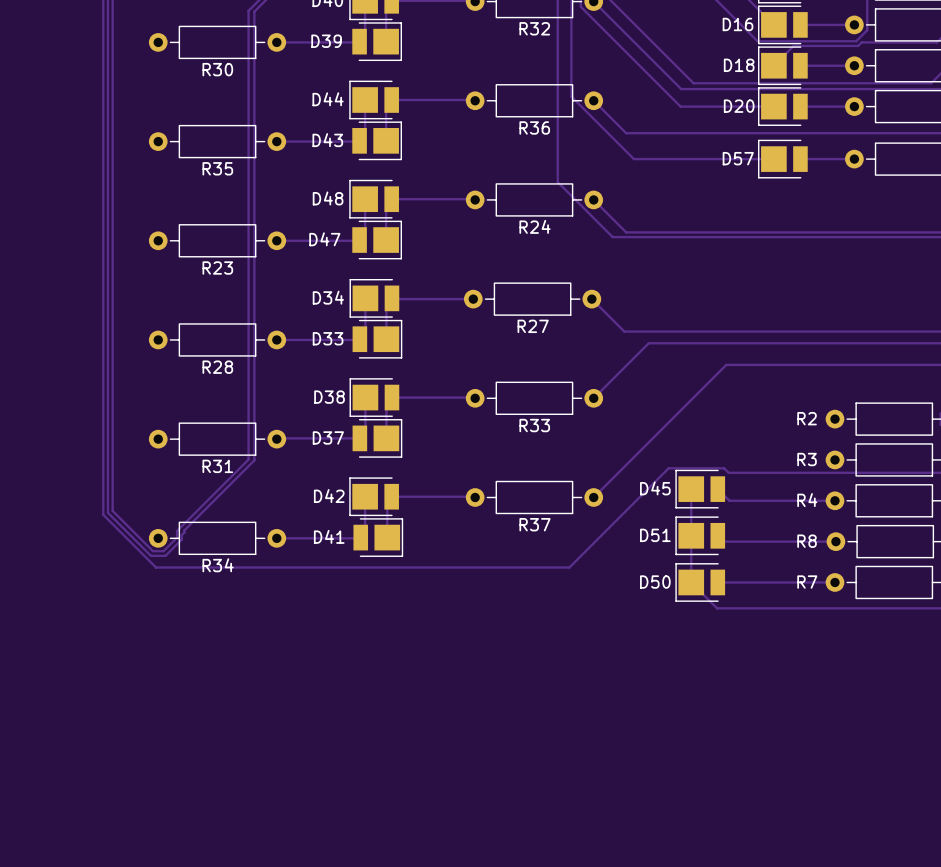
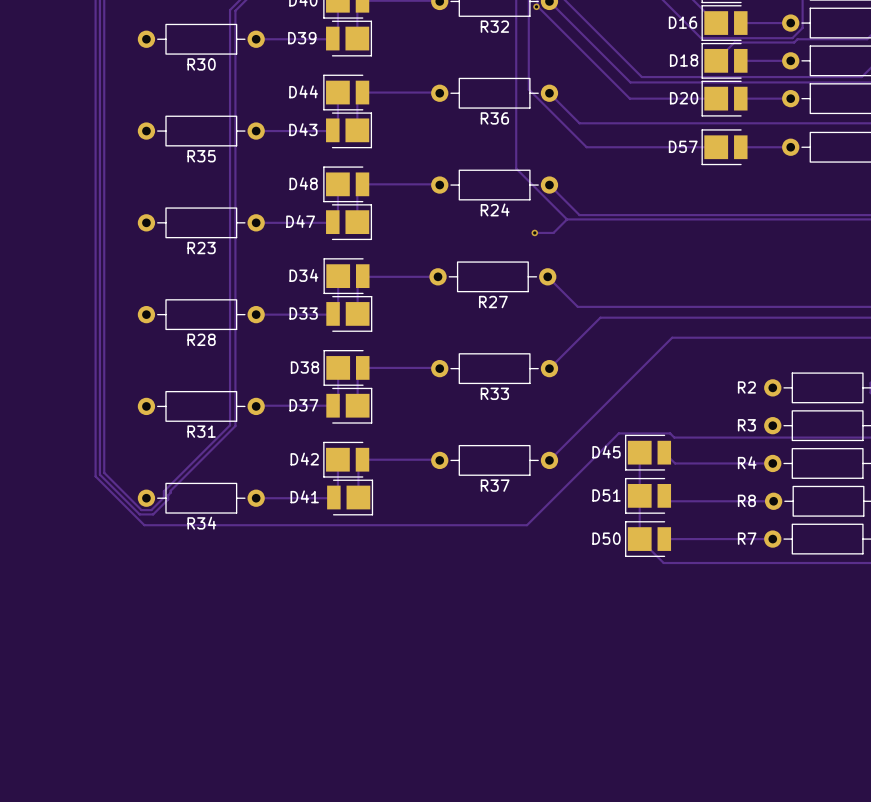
via: none -> (536, 6)
track: none -> (567, 219) (553, 232) (534, 232)
via: none -> (534, 232)

